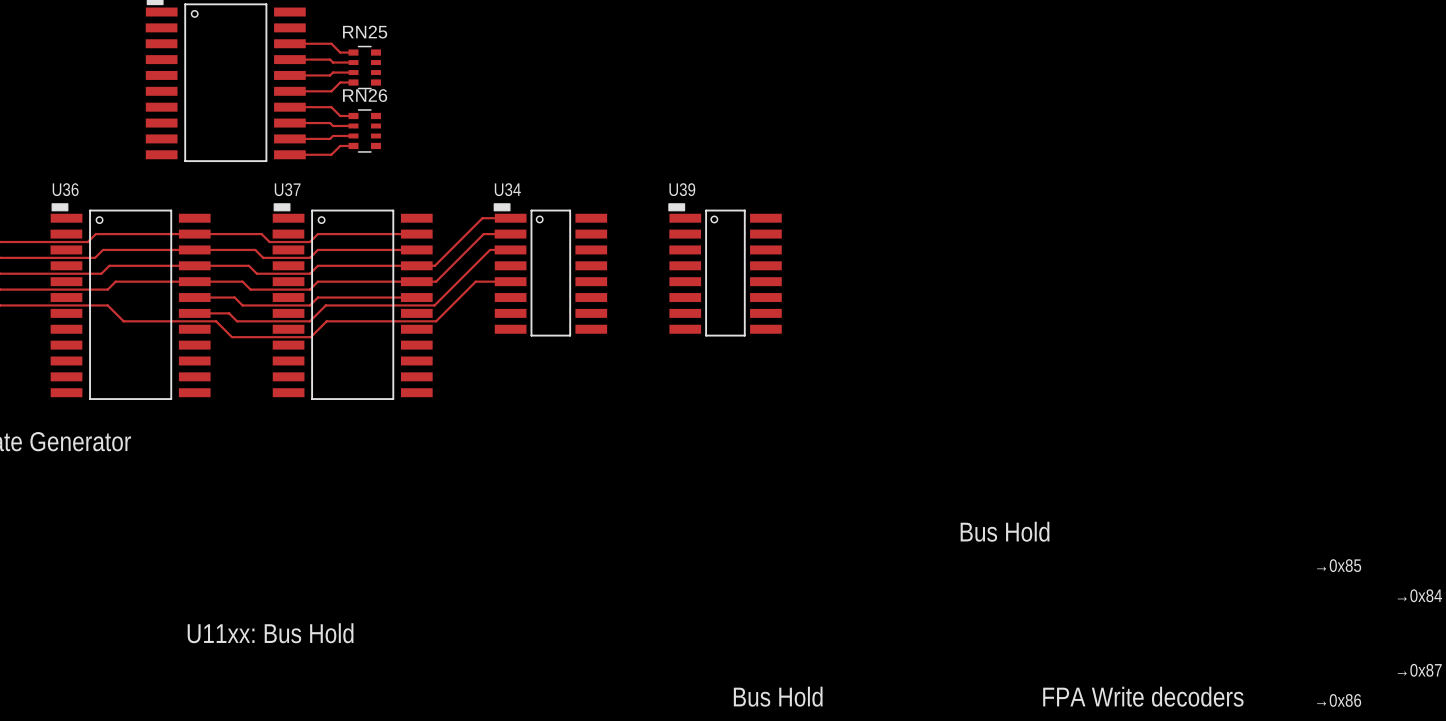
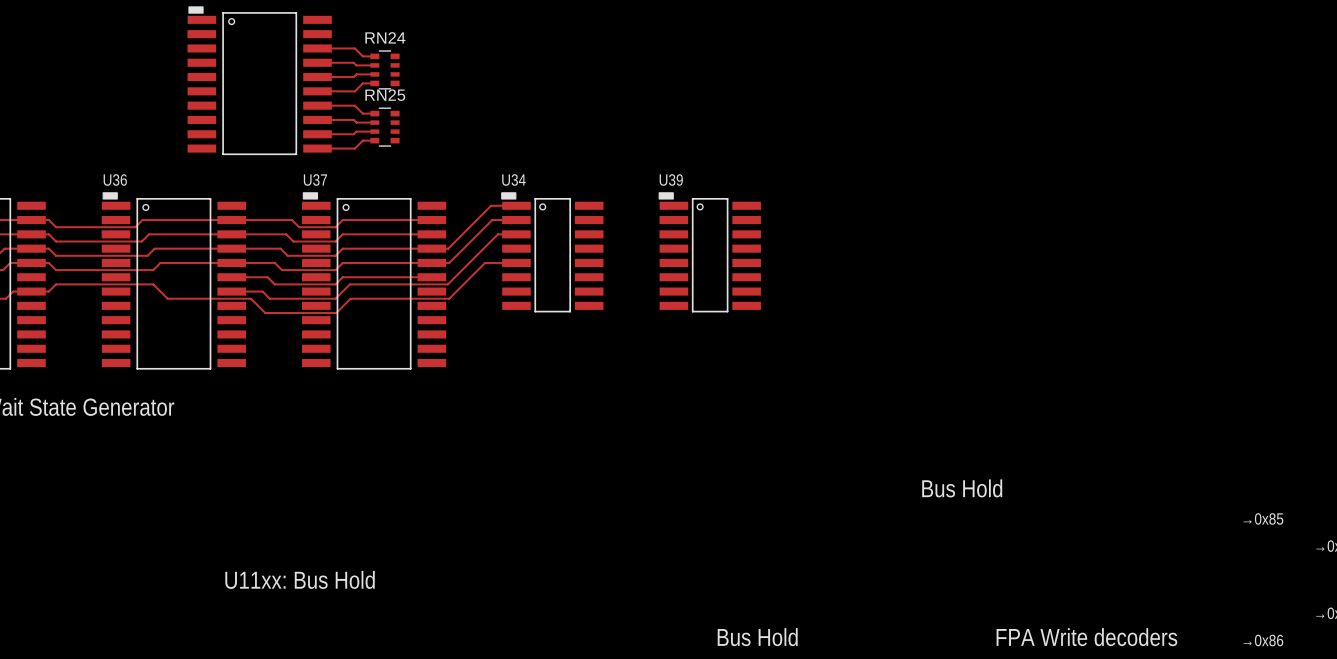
RN25 name: RN25 (365, 32) -> RN24 (385, 37)
RN26 name: RN26 (365, 95) -> RN25 (385, 95)

